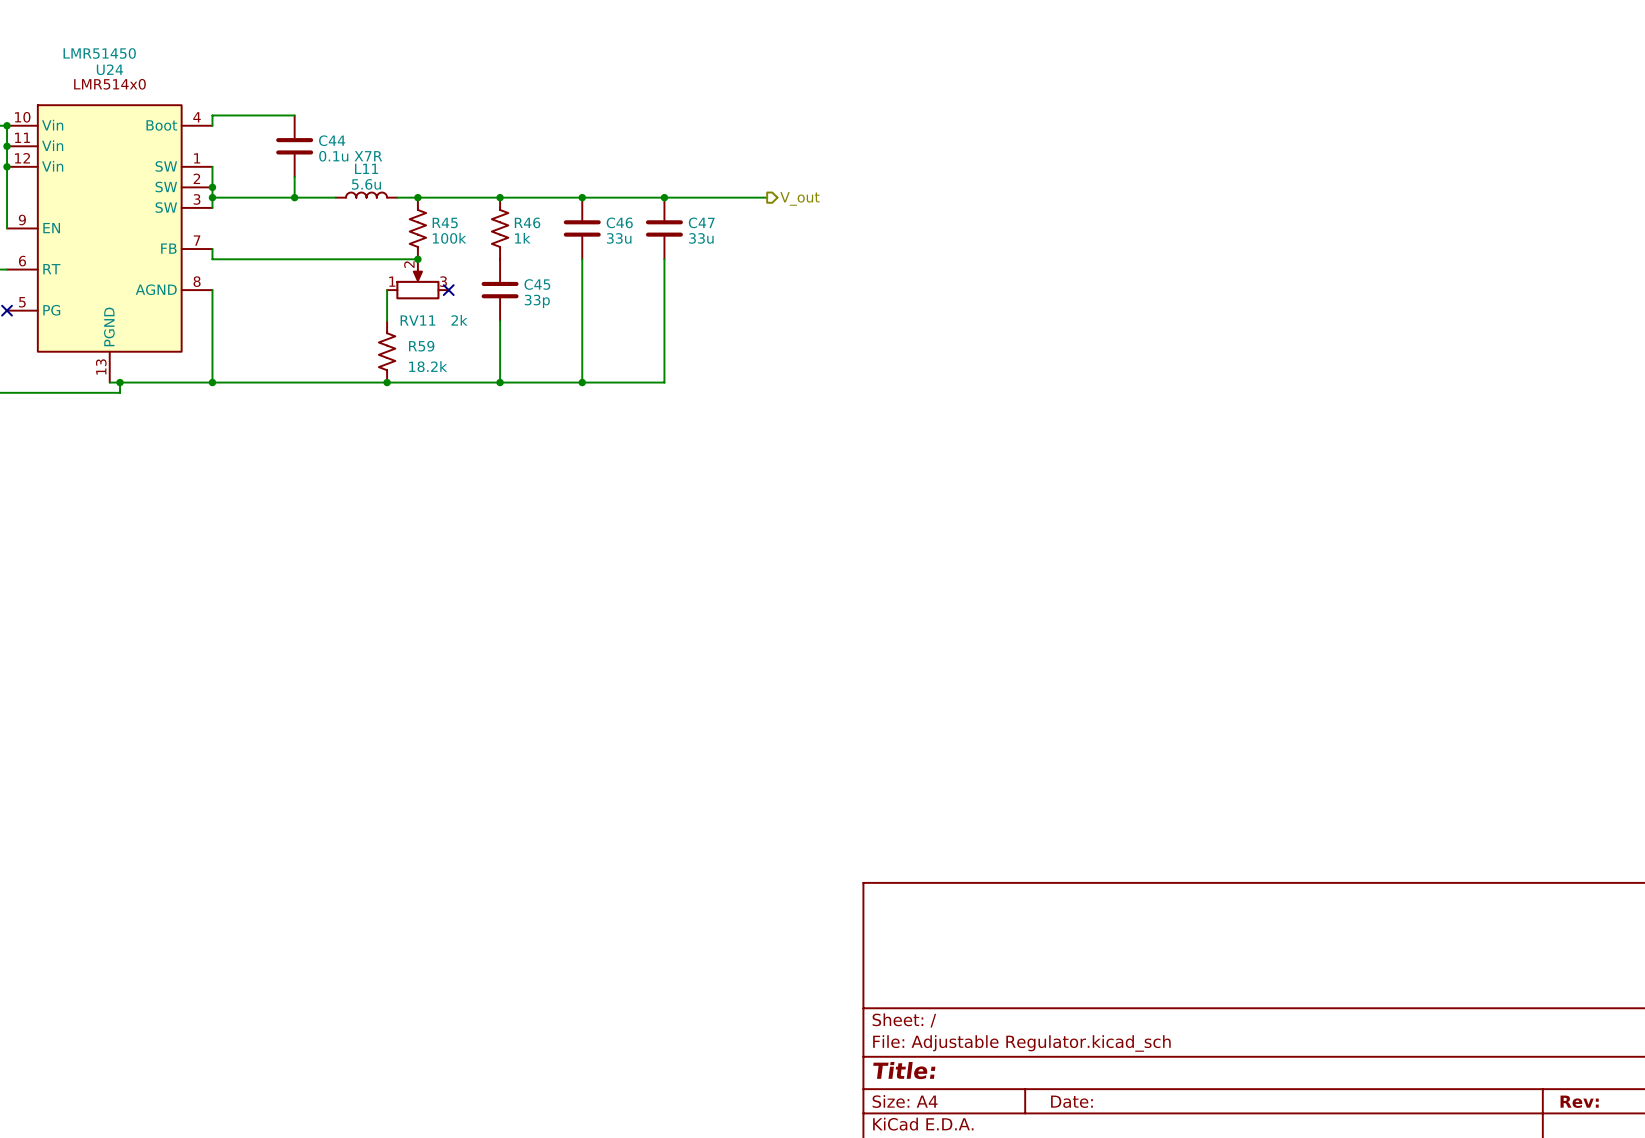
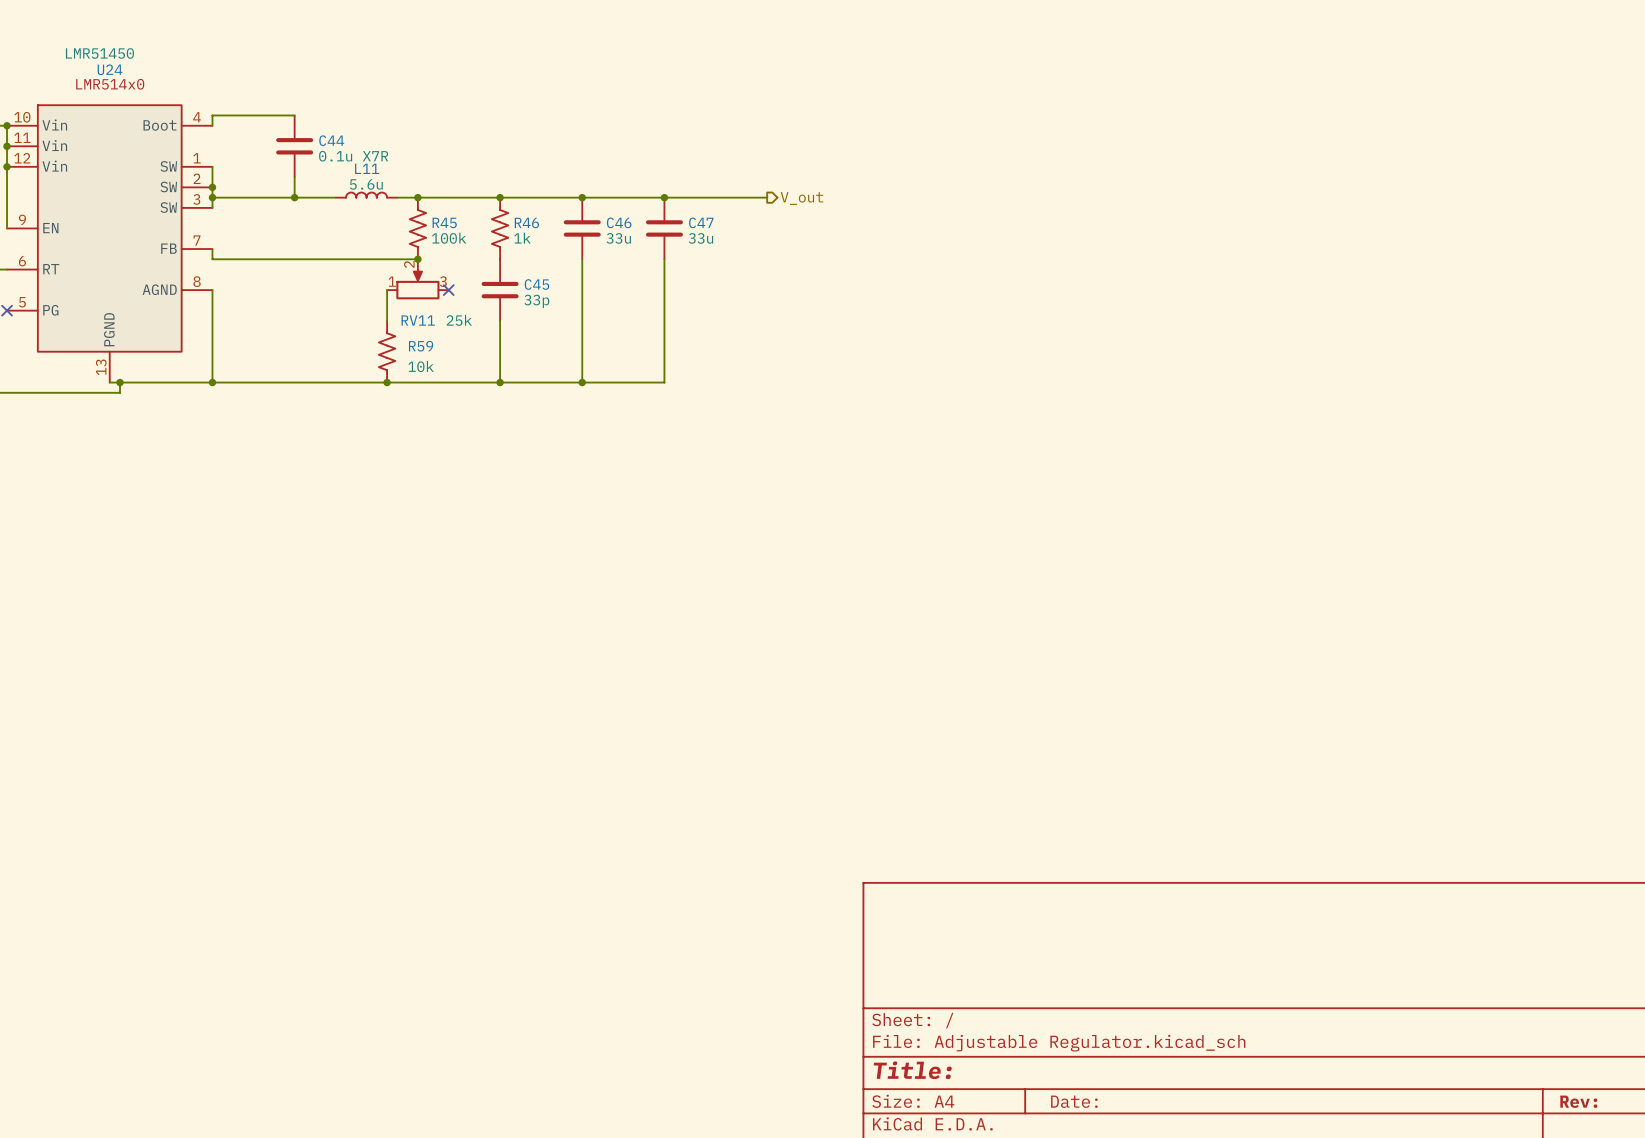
RV11 value: 2k (459, 320) -> 25k (459, 320)
R59 value: 18.2k (428, 366) -> 10k (421, 366)

